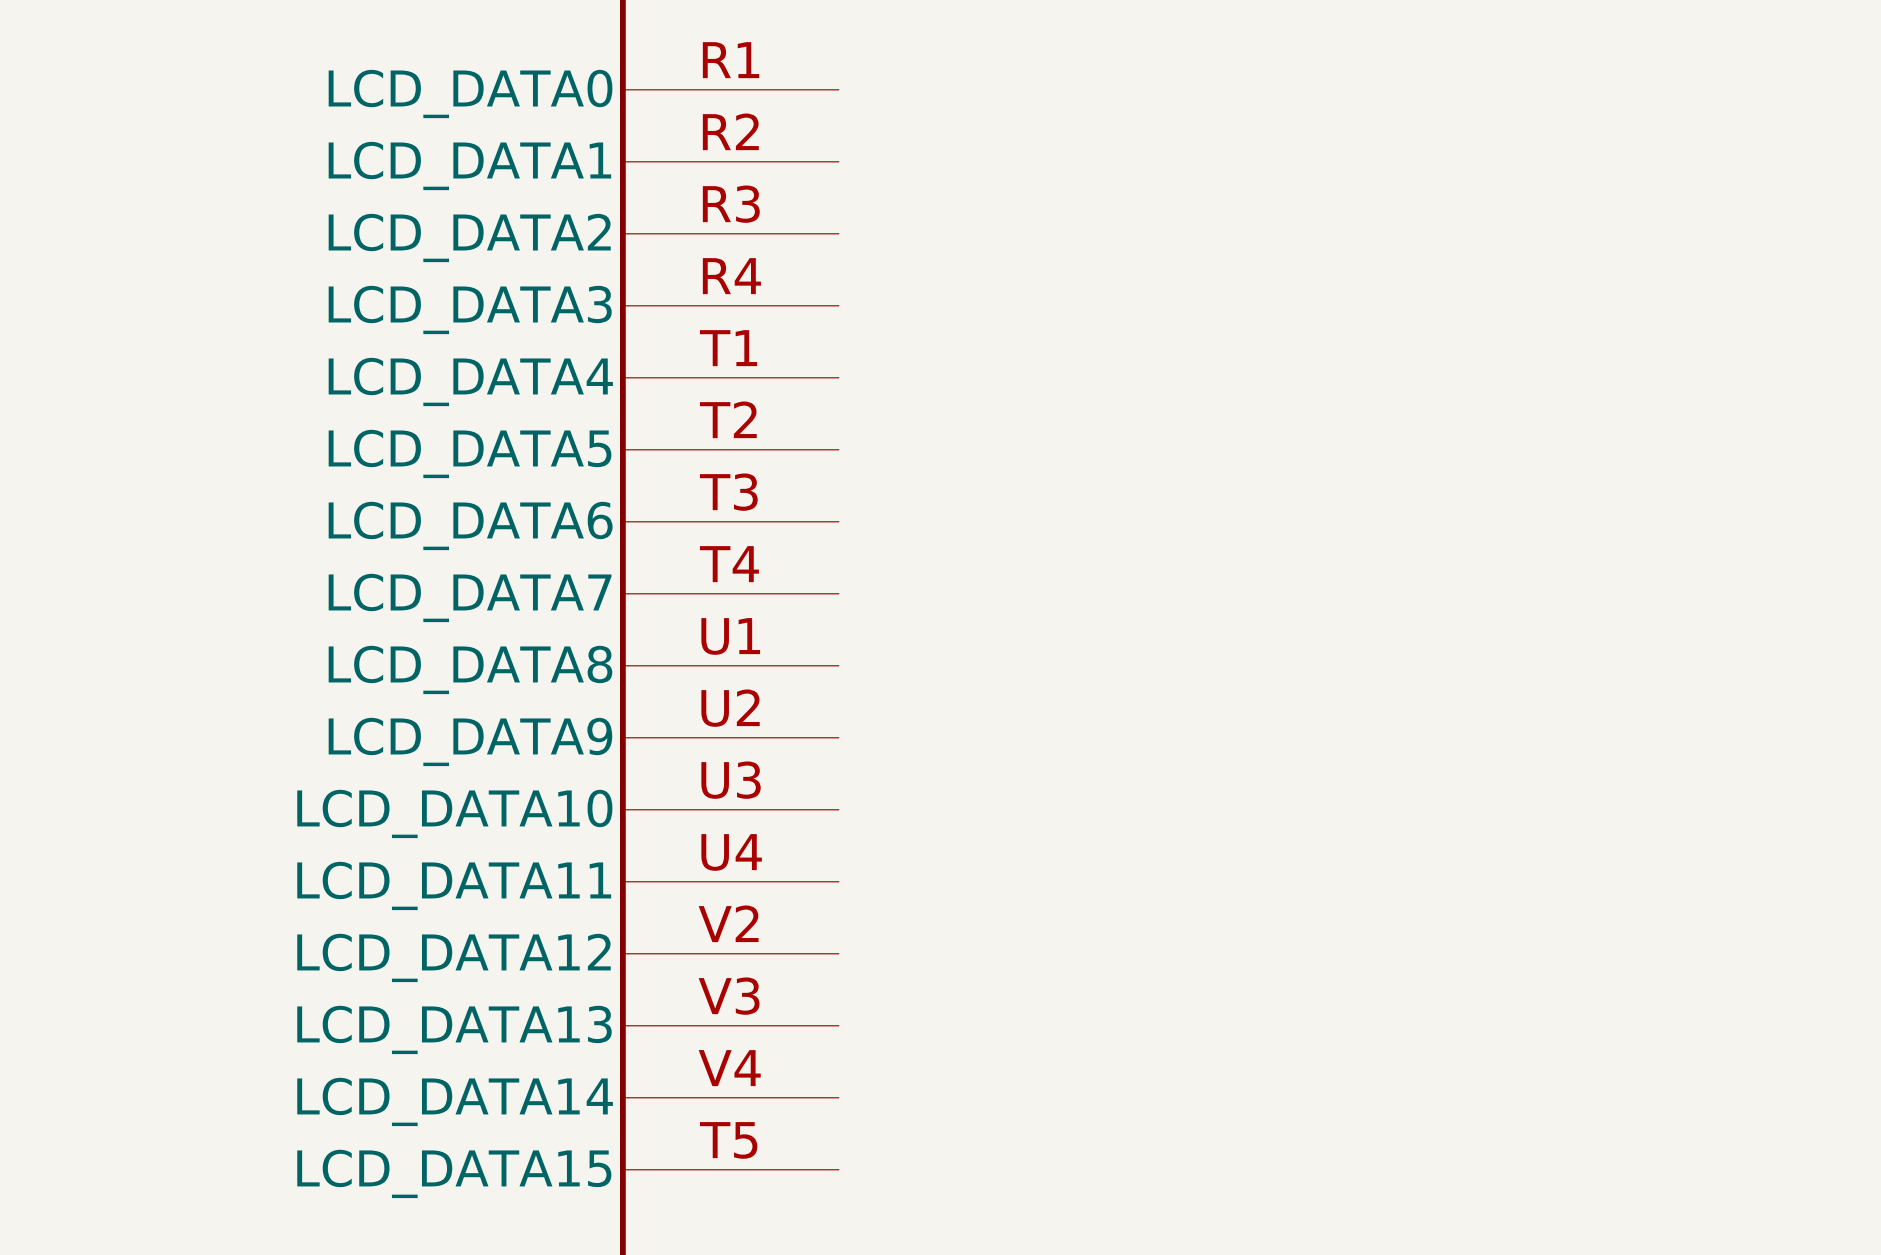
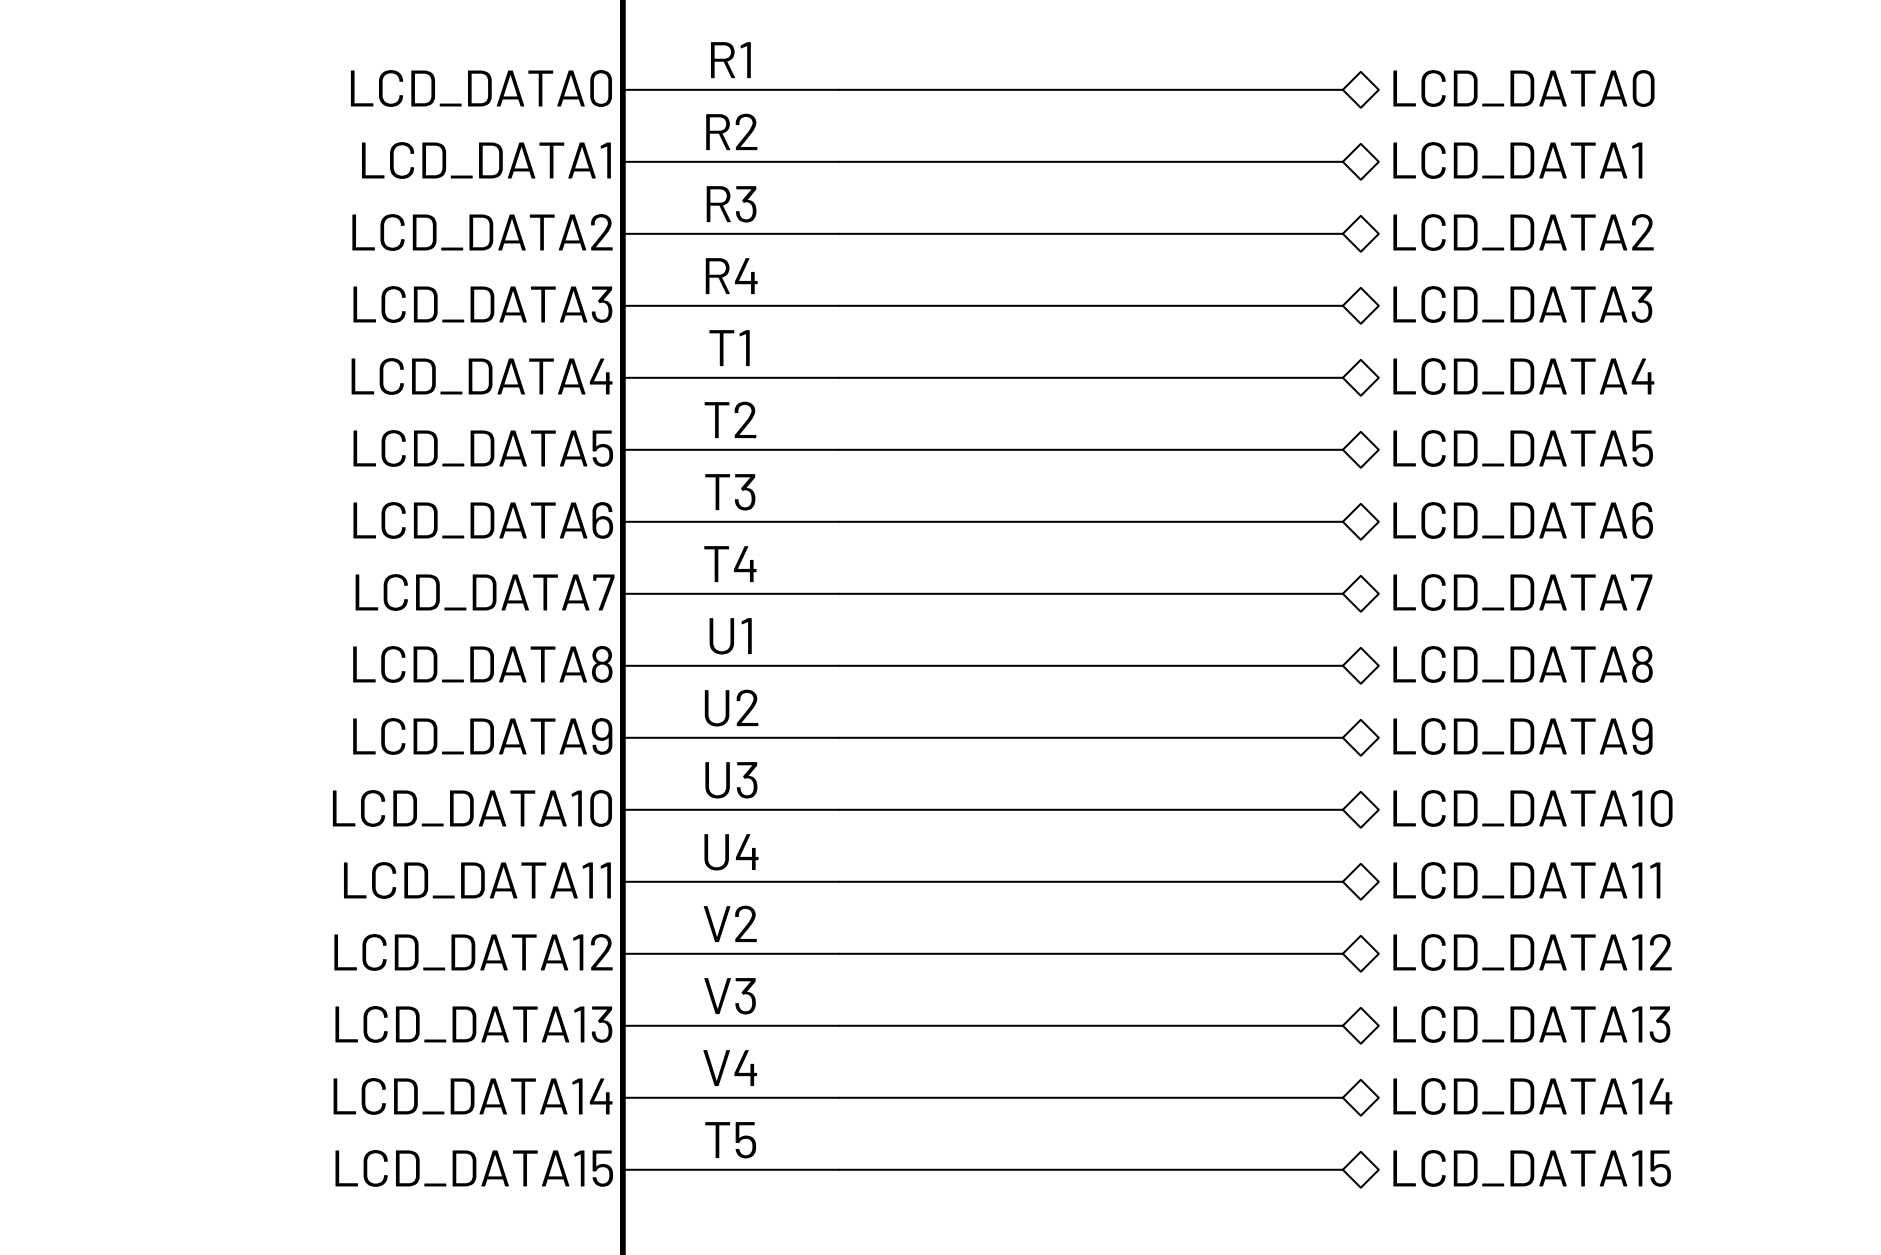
wire: none -> (838, 89) (1342, 89)
hierarchical label: none -> LCD_DATA0 (1523, 88)
wire: none -> (838, 161) (1342, 161)
hierarchical label: none -> LCD_DATA1 (1517, 160)
wire: none -> (838, 233) (1342, 233)
hierarchical label: none -> LCD_DATA2 (1523, 232)
wire: none -> (838, 305) (1342, 305)
hierarchical label: none -> LCD_DATA3 (1522, 304)
wire: none -> (838, 377) (1342, 377)
hierarchical label: none -> LCD_DATA4 (1523, 376)
wire: none -> (838, 449) (1342, 449)
hierarchical label: none -> LCD_DATA5 (1523, 448)
wire: none -> (838, 521) (1342, 521)
hierarchical label: none -> LCD_DATA6 (1523, 520)
wire: none -> (838, 593) (1342, 593)
hierarchical label: none -> LCD_DATA7 (1522, 592)
wire: none -> (838, 665) (1342, 665)
hierarchical label: none -> LCD_DATA8 (1523, 664)
wire: none -> (838, 737) (1342, 737)
hierarchical label: none -> LCD_DATA9 (1522, 736)
wire: none -> (838, 809) (1342, 809)
hierarchical label: none -> LCD_DATA10 (1532, 808)
wire: none -> (838, 881) (1342, 881)
hierarchical label: none -> LCD_DATA11 (1526, 880)
wire: none -> (838, 953) (1342, 953)
hierarchical label: none -> LCD_DATA12 (1532, 952)
wire: none -> (838, 1025) (1342, 1025)
hierarchical label: none -> LCD_DATA13 (1531, 1024)
wire: none -> (838, 1097) (1342, 1097)
hierarchical label: none -> LCD_DATA14 (1532, 1096)
wire: none -> (838, 1169) (1342, 1169)
hierarchical label: none -> LCD_DATA15 (1532, 1168)

